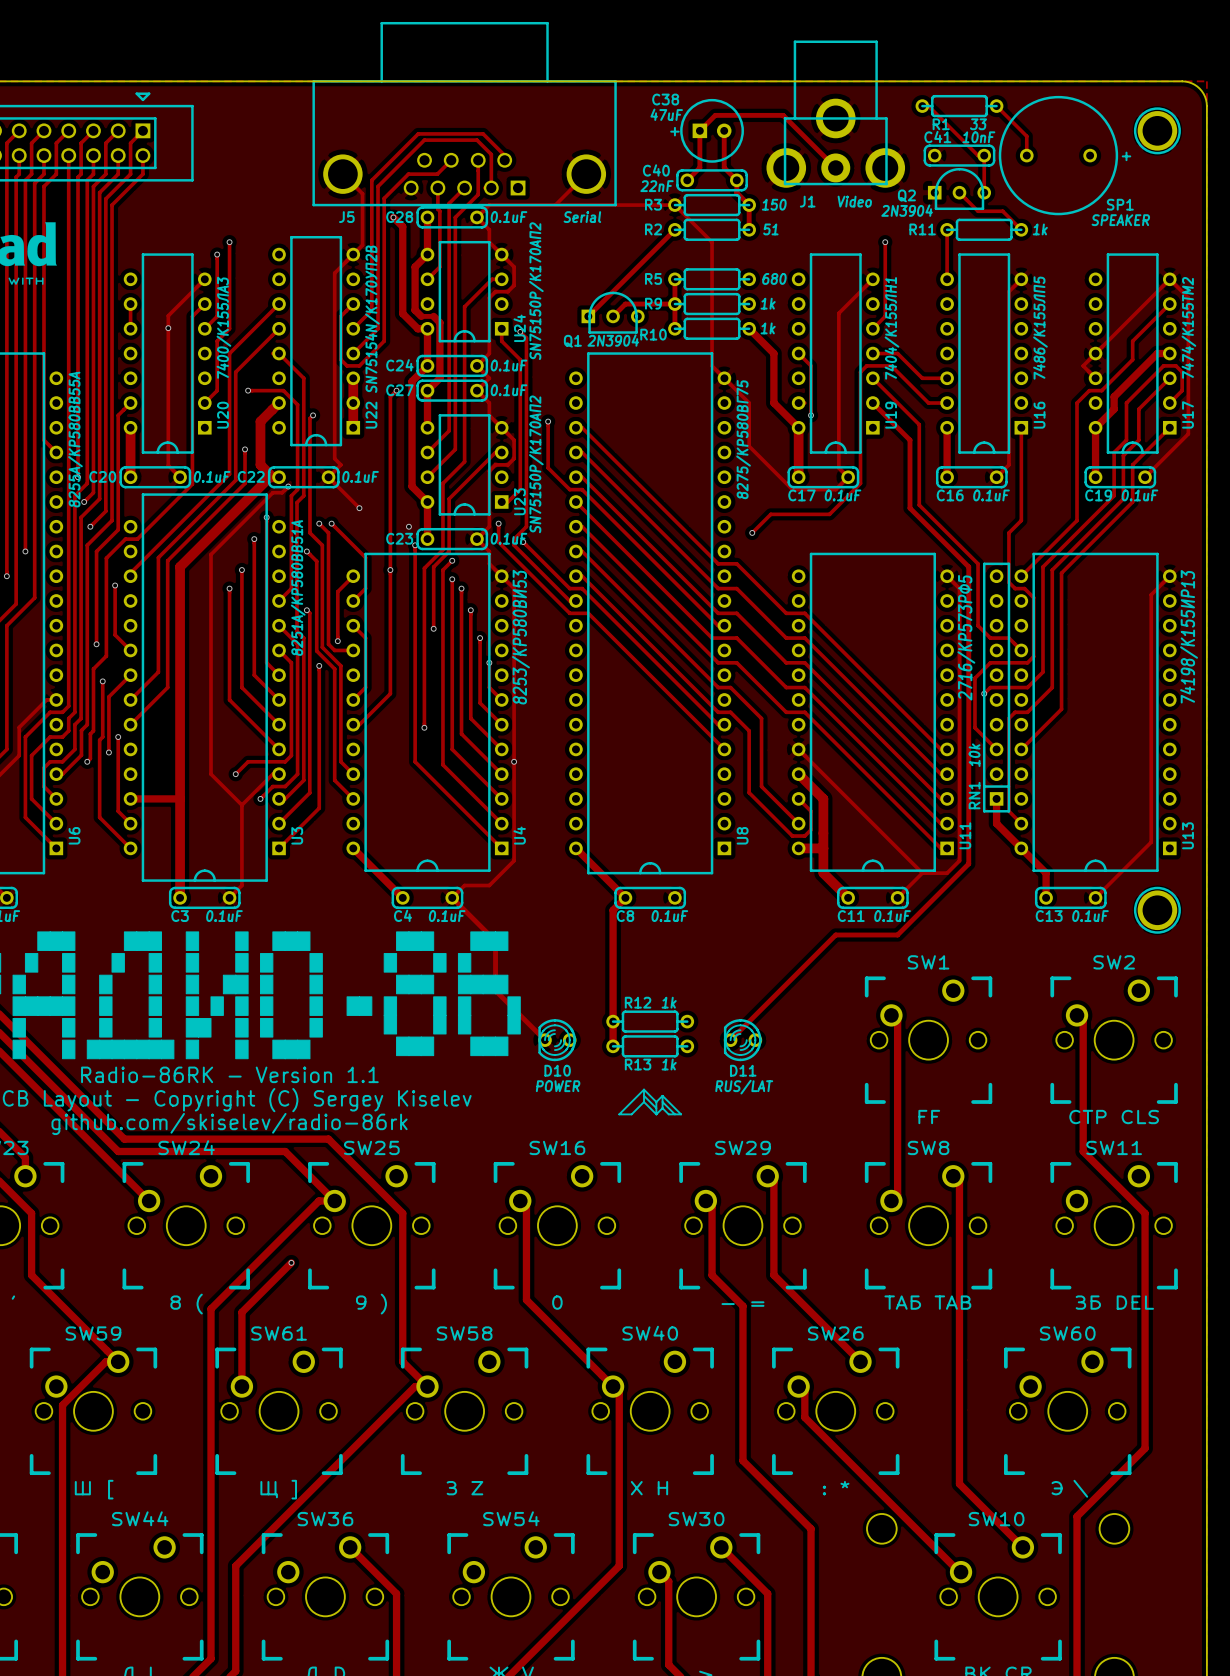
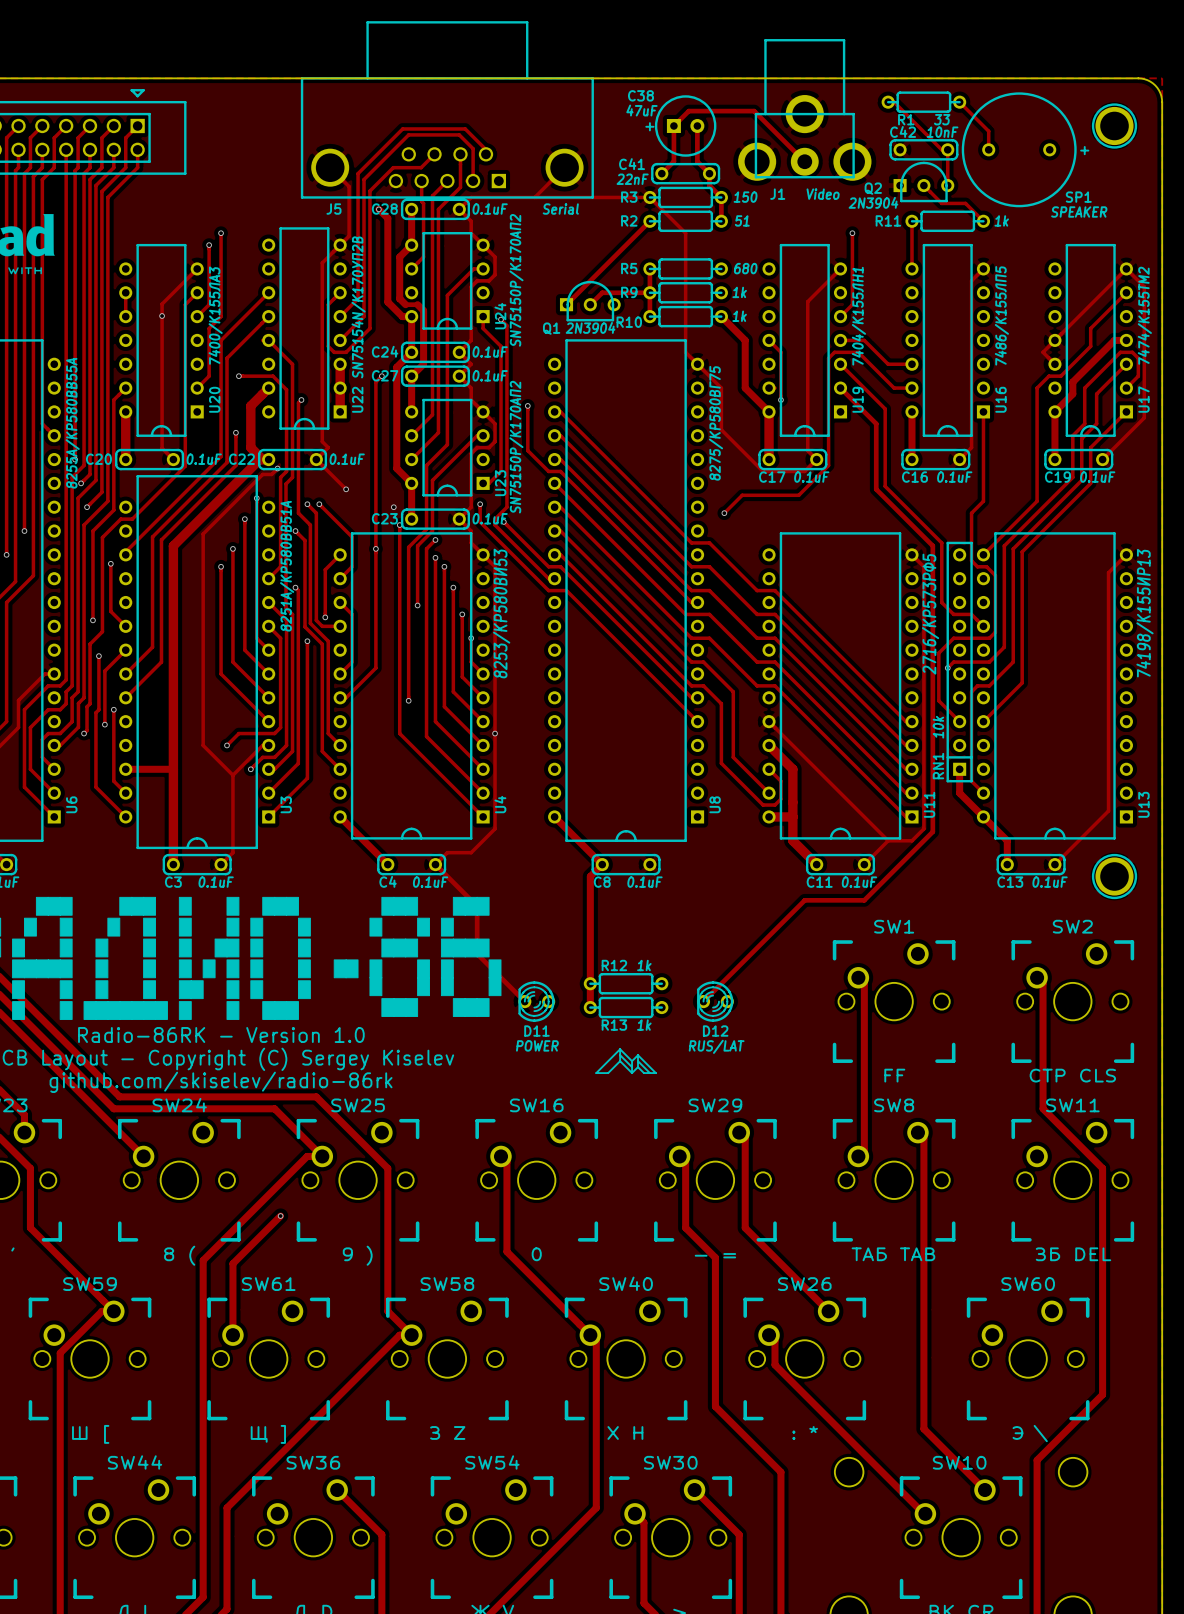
C41 name: C41 (937, 137) -> C42 (903, 131)
C40 name: C40 (656, 170) -> C41 (632, 164)
D10 name: D10 (557, 1070) -> D11 (536, 1031)
D11 name: D11 (743, 1070) -> D12 (715, 1031)
text: Radio-86RK - Version 1.1 (229, 1074) -> Radio-86RK - Version 1.0 (221, 1035)

